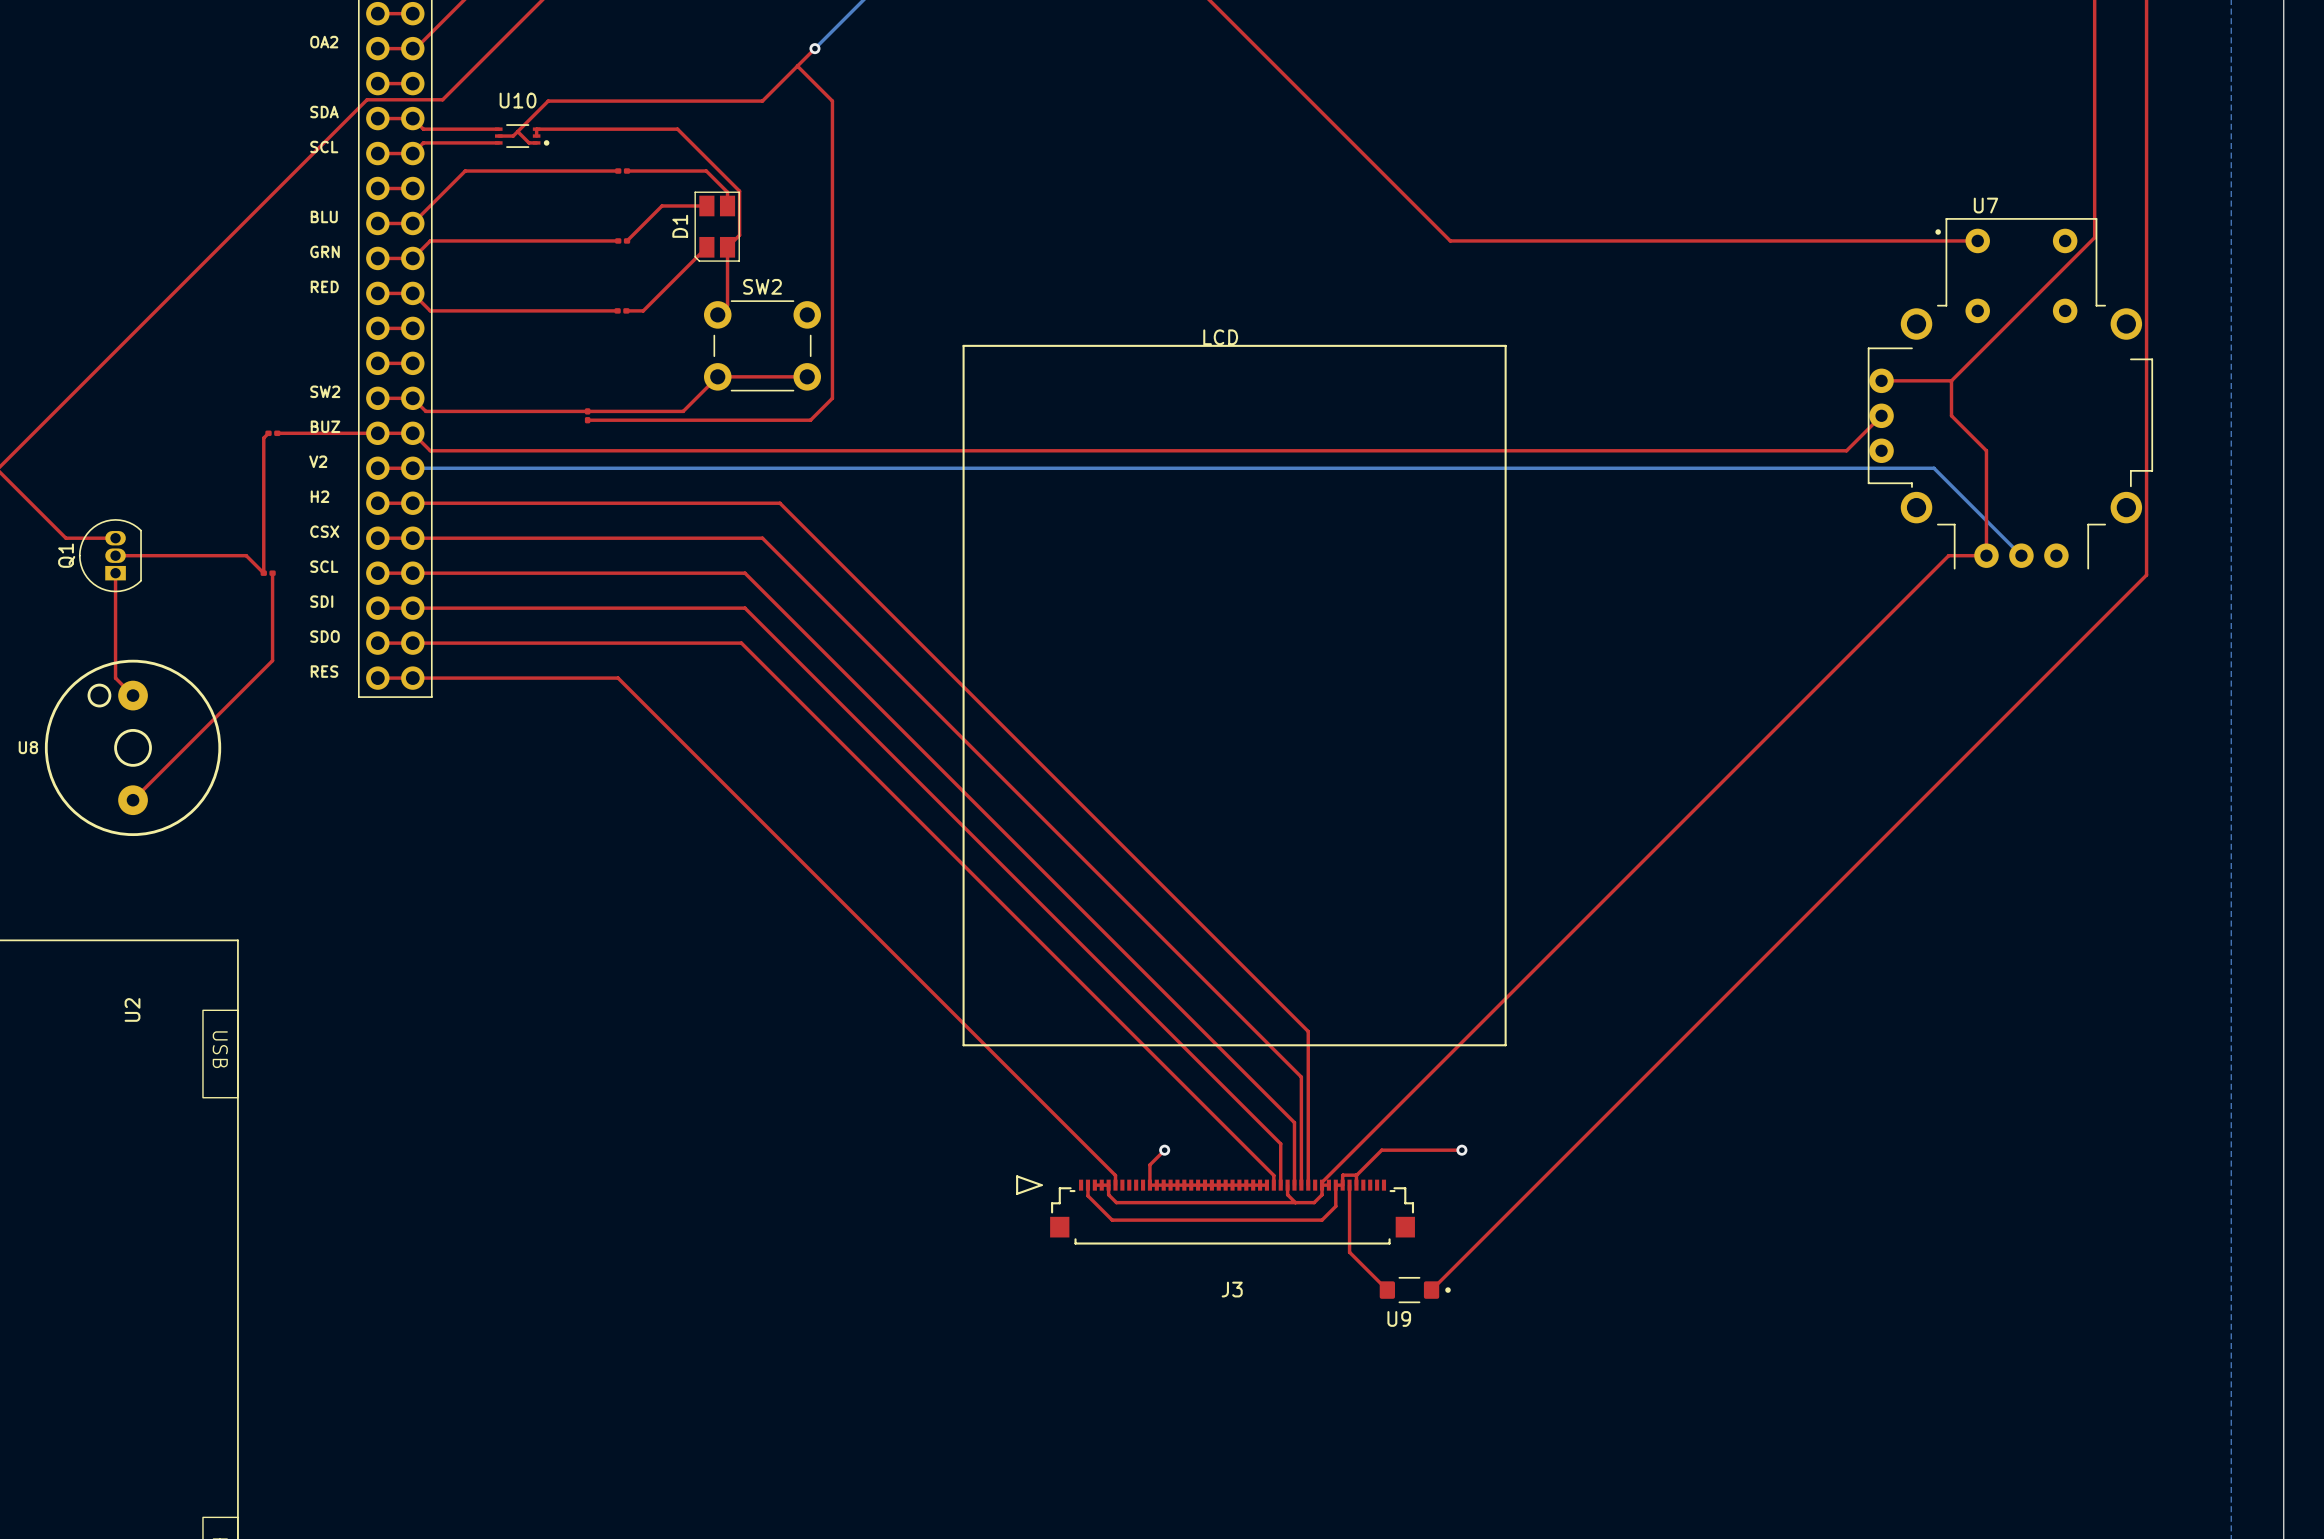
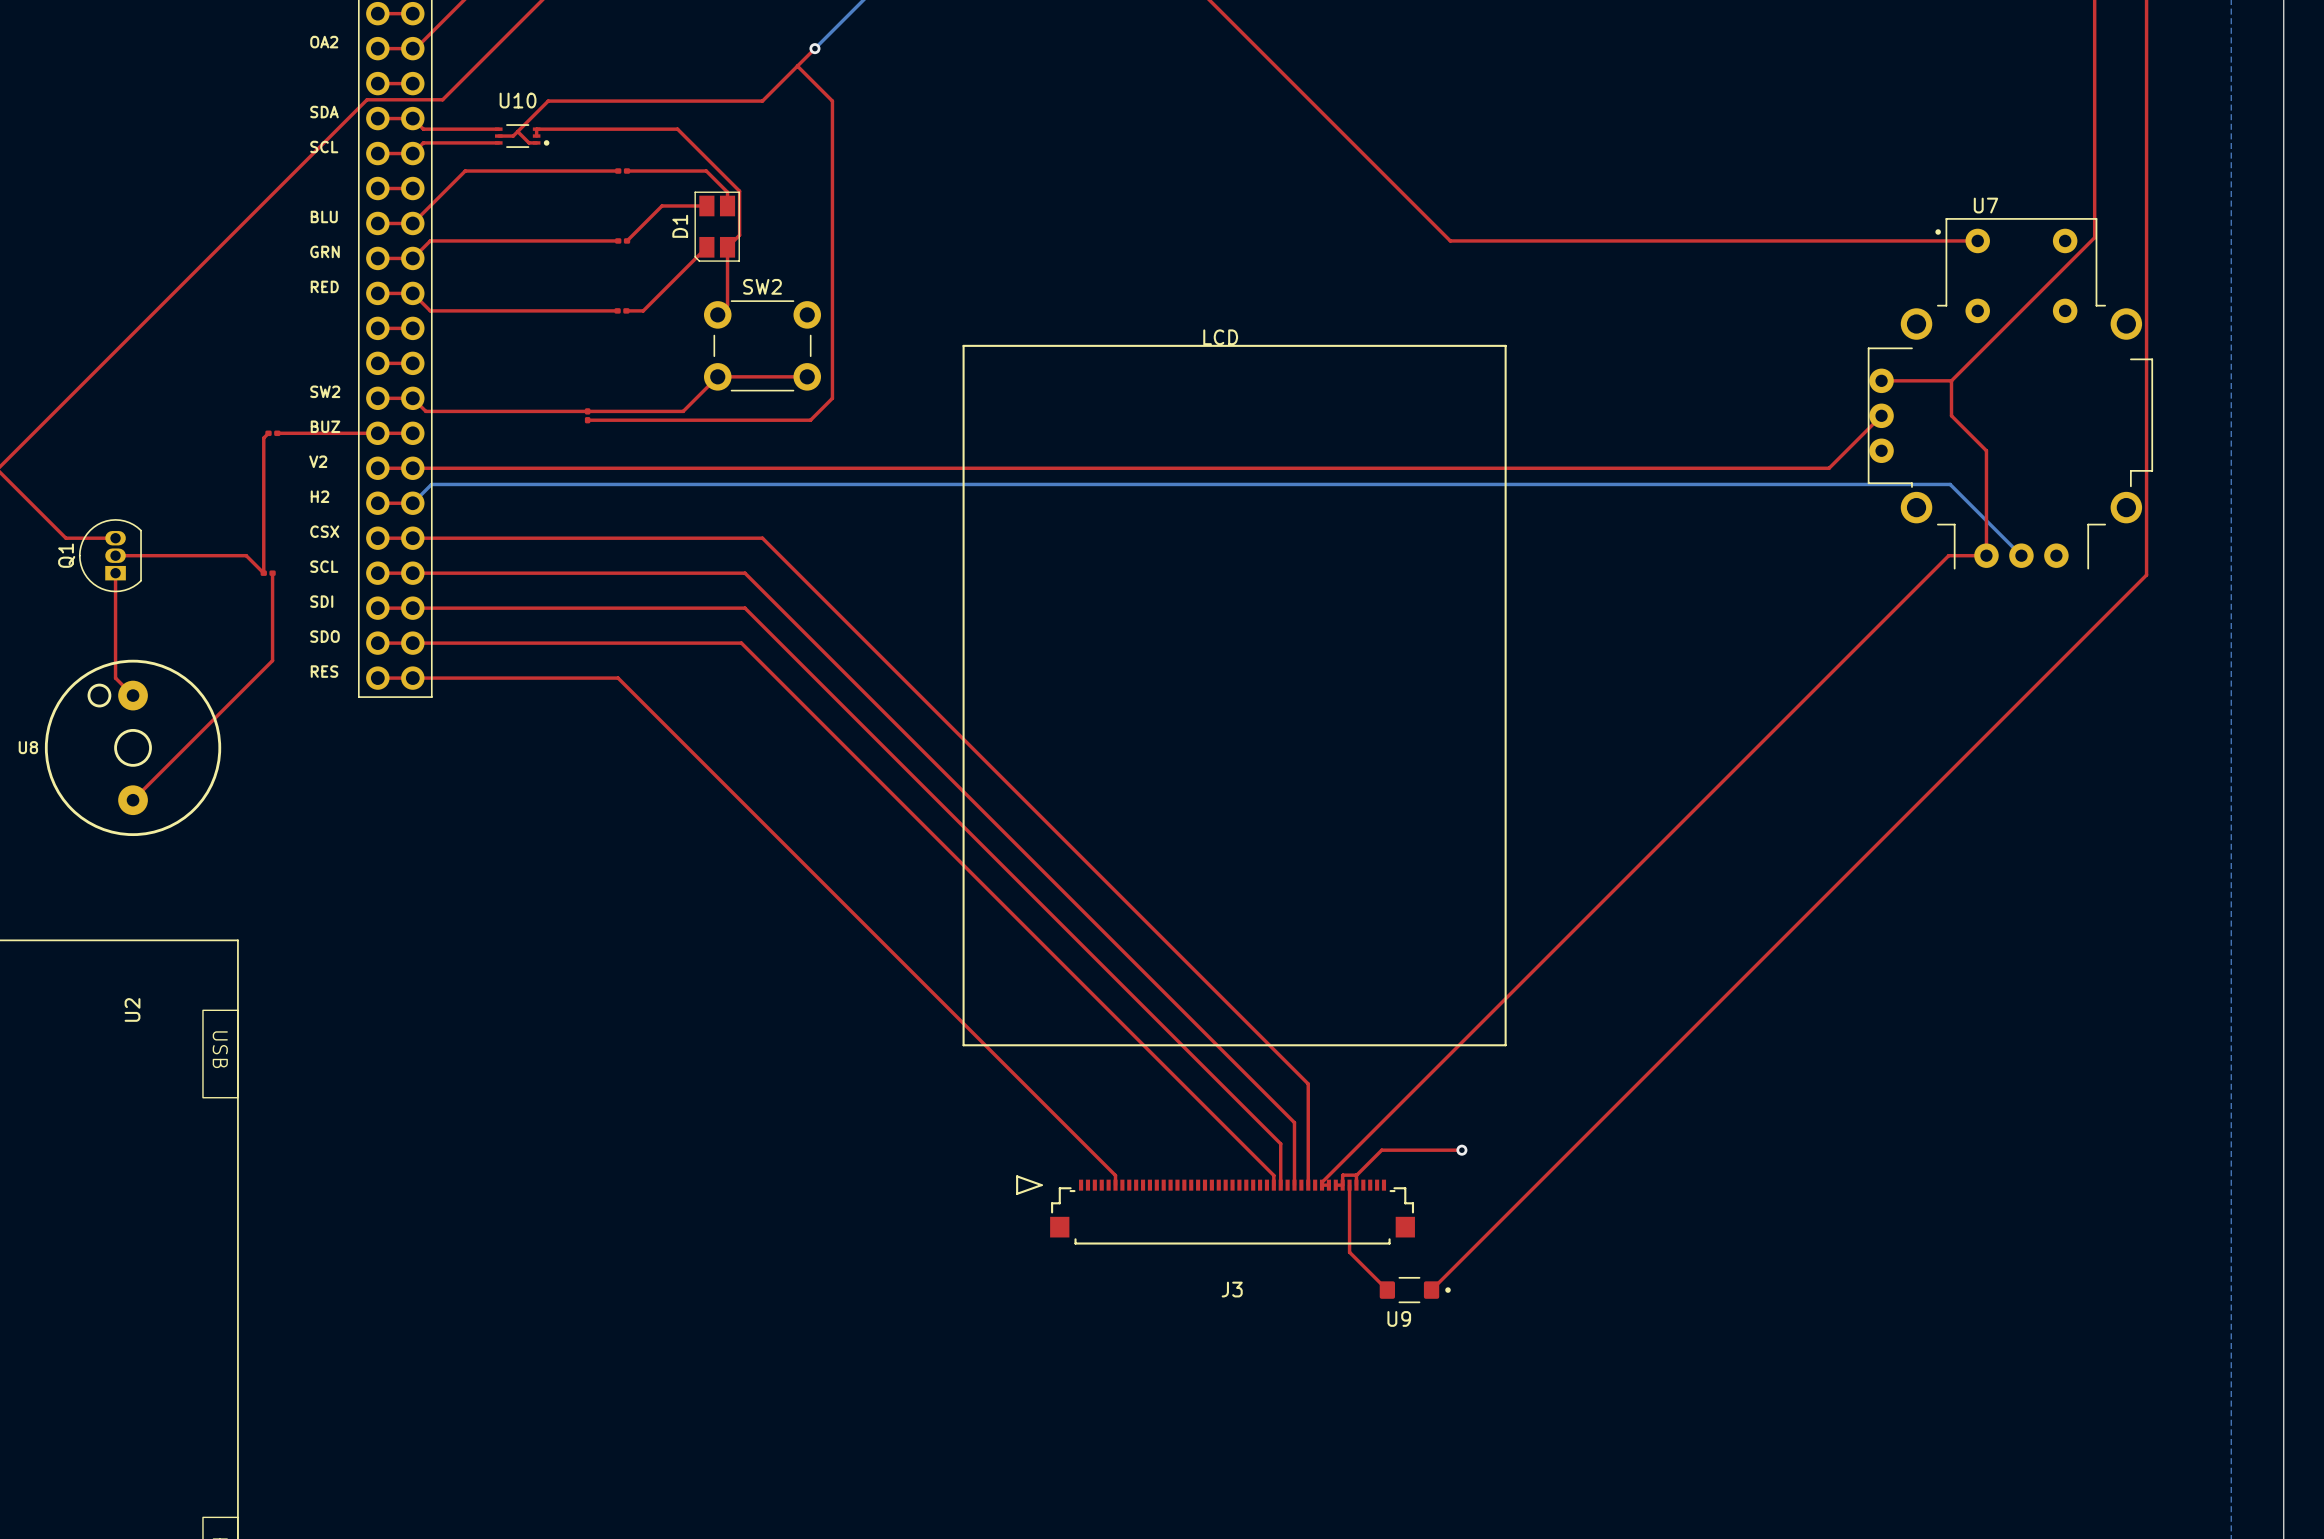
top track: (417, 437) (430, 450) (1846, 450) -> (412, 468) (1829, 468) (1846, 450)
bottom track: (412, 468) (1934, 468) (1950, 484) -> (412, 503) (431, 484) (1950, 484)
top track: (412, 503) (779, 503) (1308, 1031) (1308, 1083) -> none
top track: (1301, 1077) (1301, 1185) -> (1301, 1077) (1308, 1083)
top track: (1164, 1150) (1149, 1164) (1149, 1185) (1266, 1185) -> none
via: (1164, 1150) -> none
top track: (1087, 1185) (1087, 1195) (1112, 1220) (1322, 1220) (1335, 1206) (1335, 1185) -> none
top track: (1094, 1185) (1108, 1185) (1108, 1194) (1116, 1202) (1314, 1202) (1322, 1194) (1322, 1185) -> none
top track: (1287, 1185) (1287, 1194) (1295, 1202) -> none

